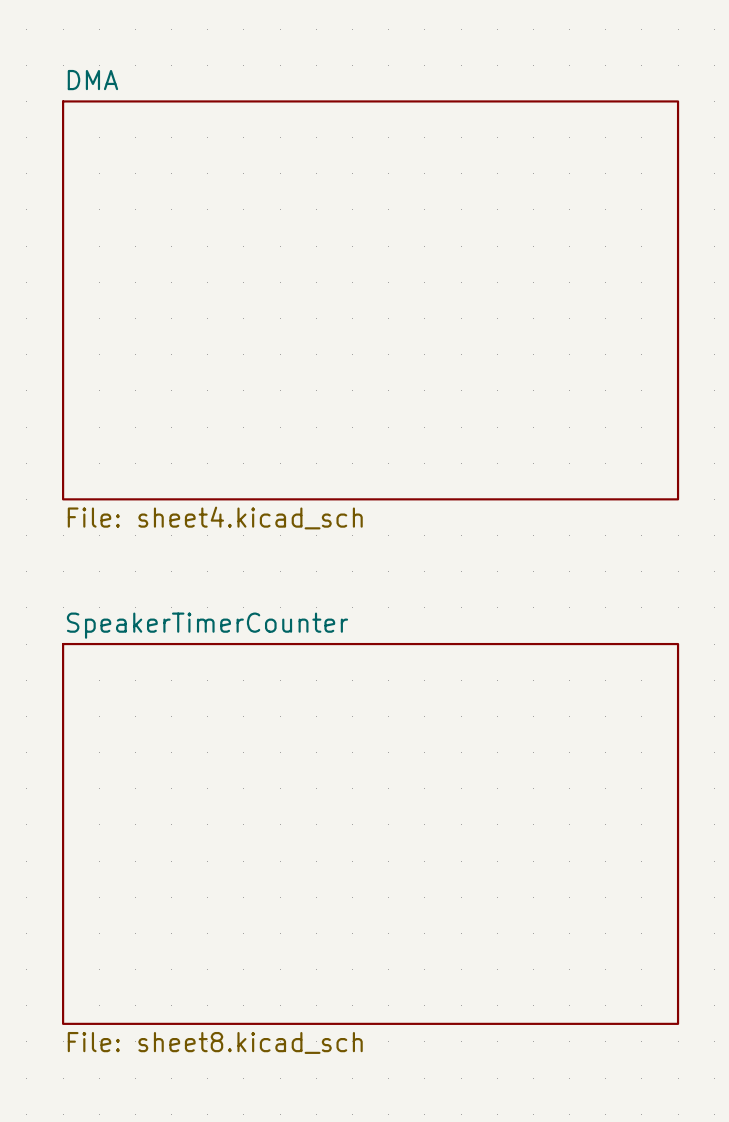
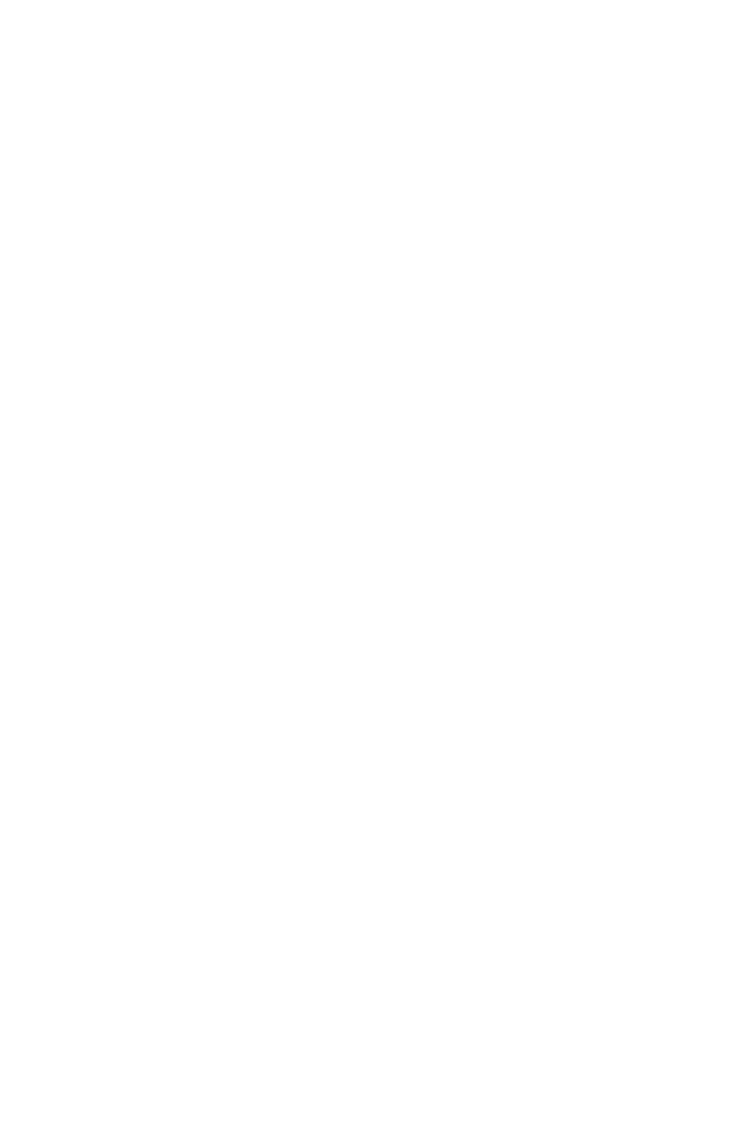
sheet DMA: File: sheet4.kicad_sch (370, 300) -> none
sheet SpeakerTimerCounter: File: sheet8.kicad_sch (370, 833) -> none

